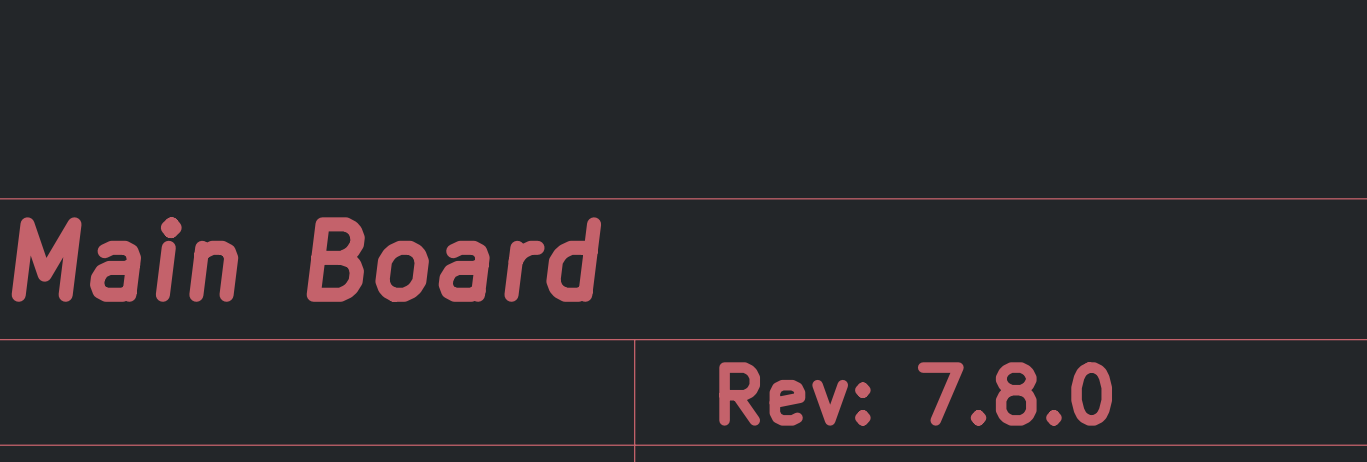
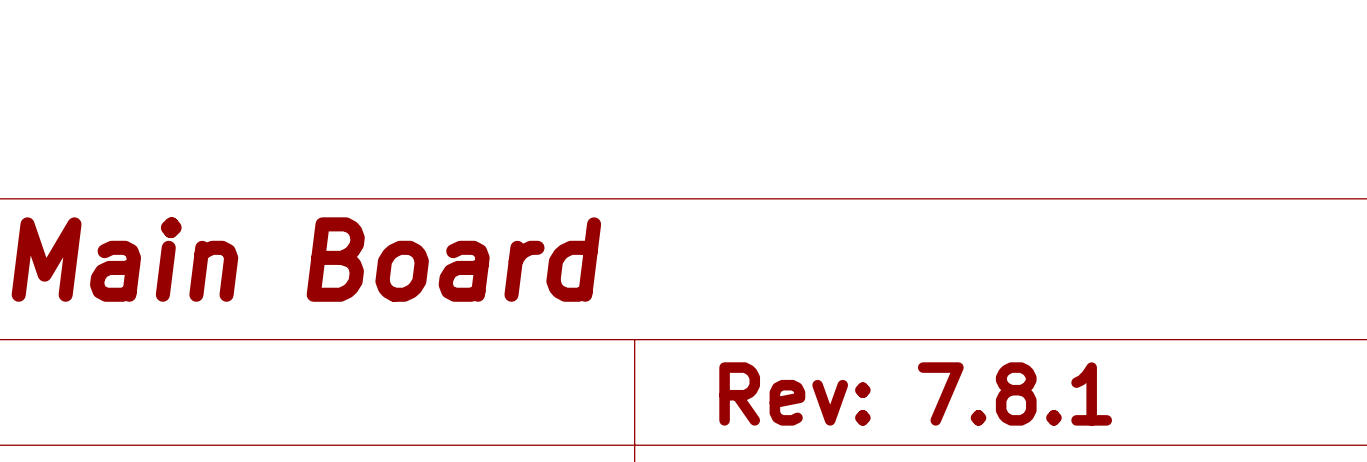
title block: Rev: 7.8.0 (915, 393) -> Rev: 7.8.1 (915, 393)

